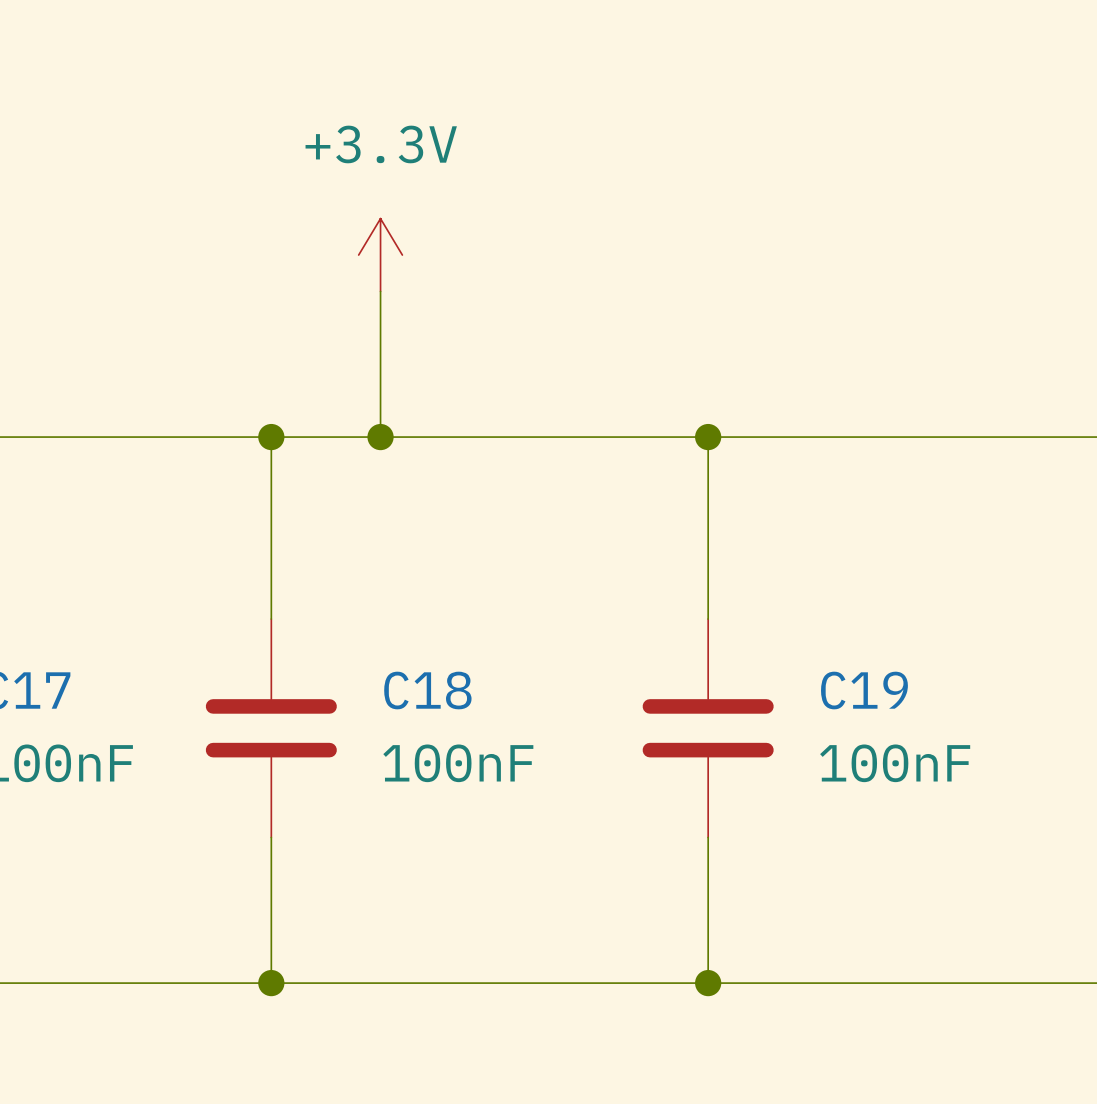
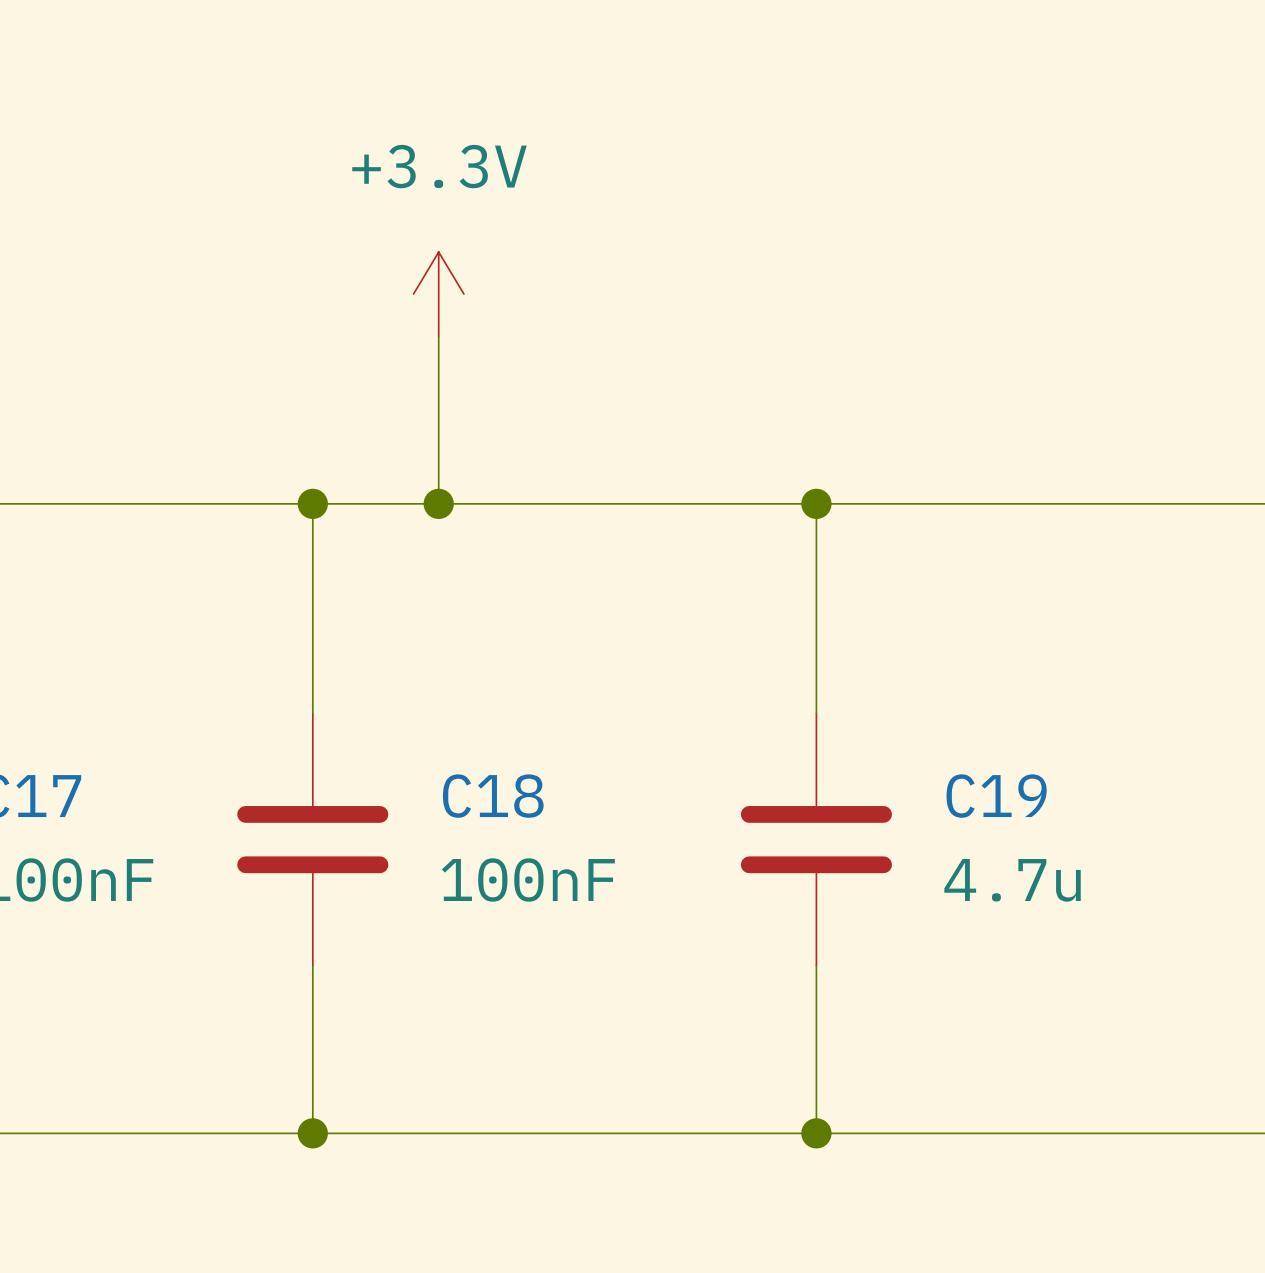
C19 value: 100nF (895, 763) -> 4.7u (1012, 880)

